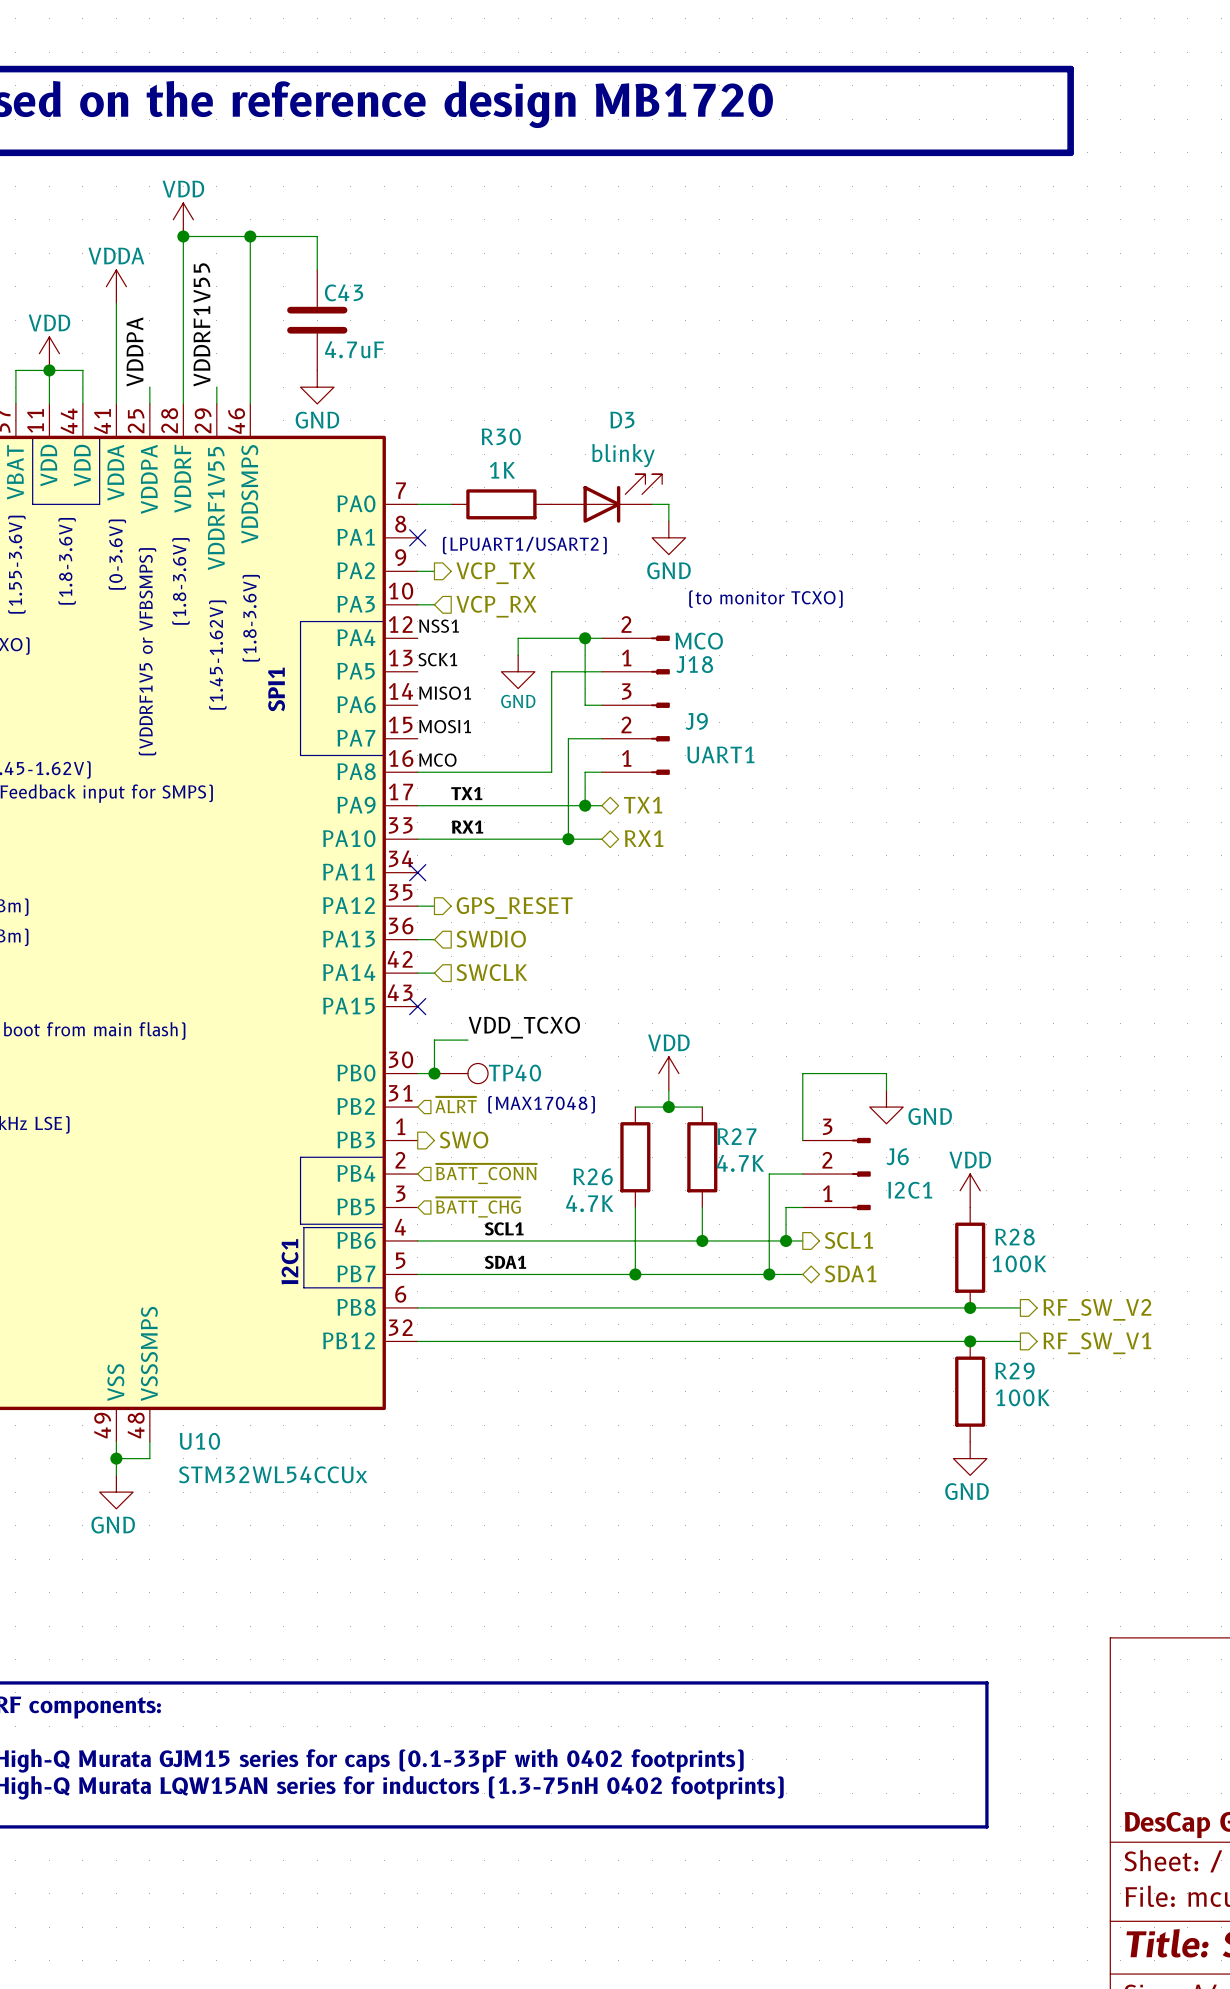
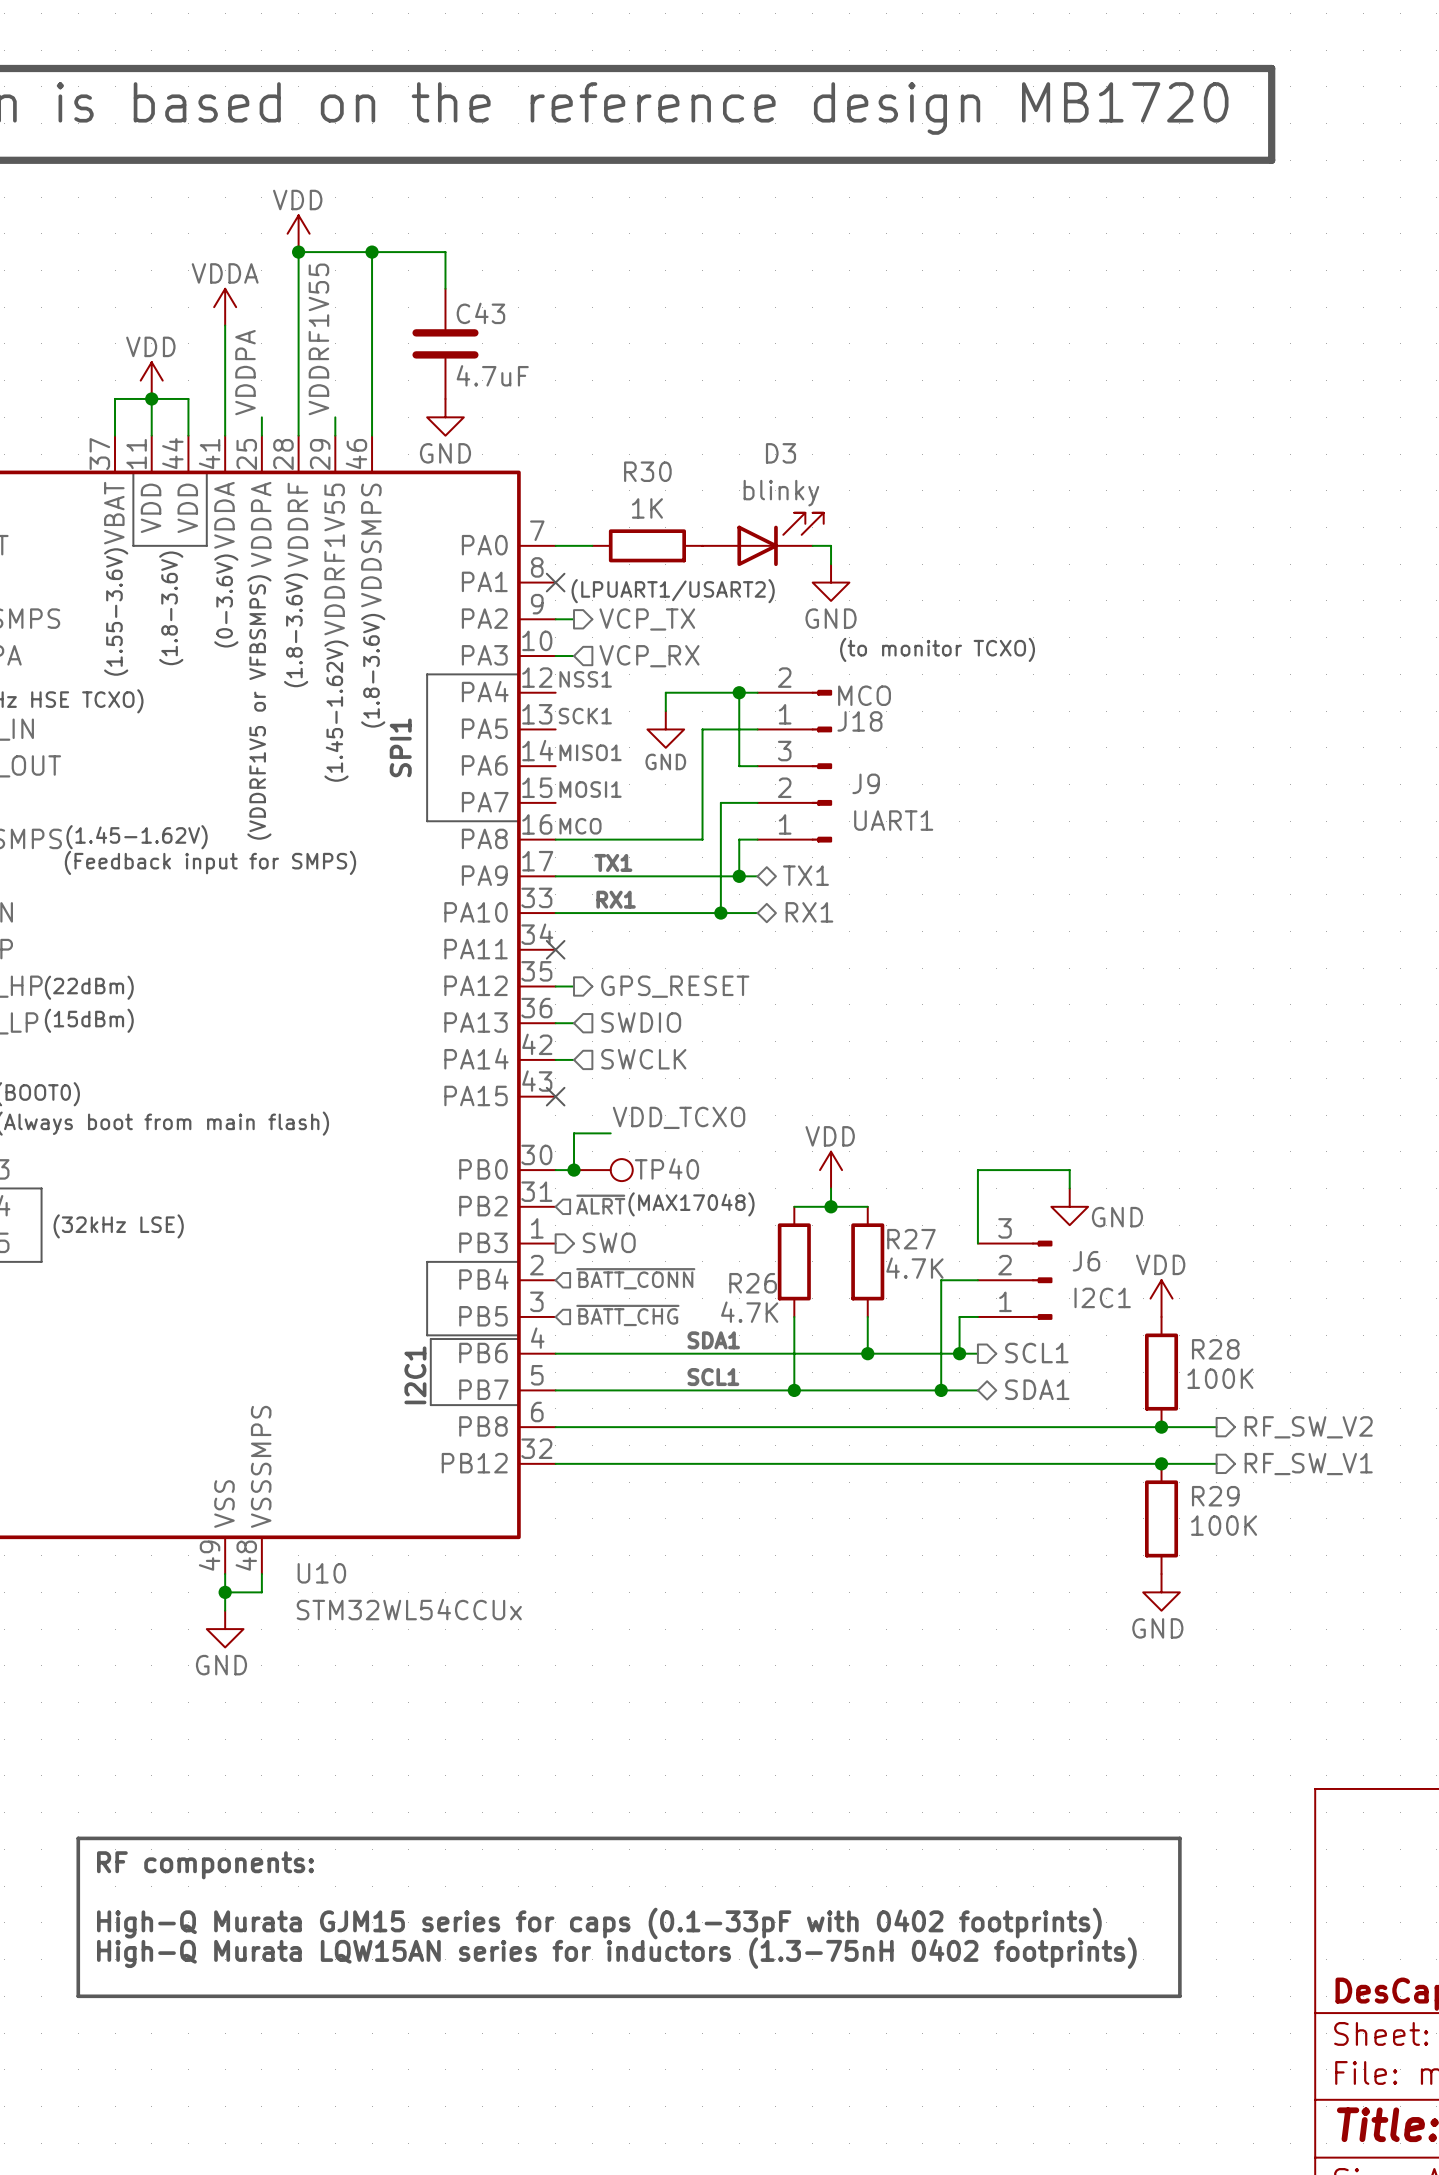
label position: SCL1 (504, 1228) -> SCL1 (713, 1377)
label position: SDA1 (505, 1262) -> SDA1 (713, 1340)

